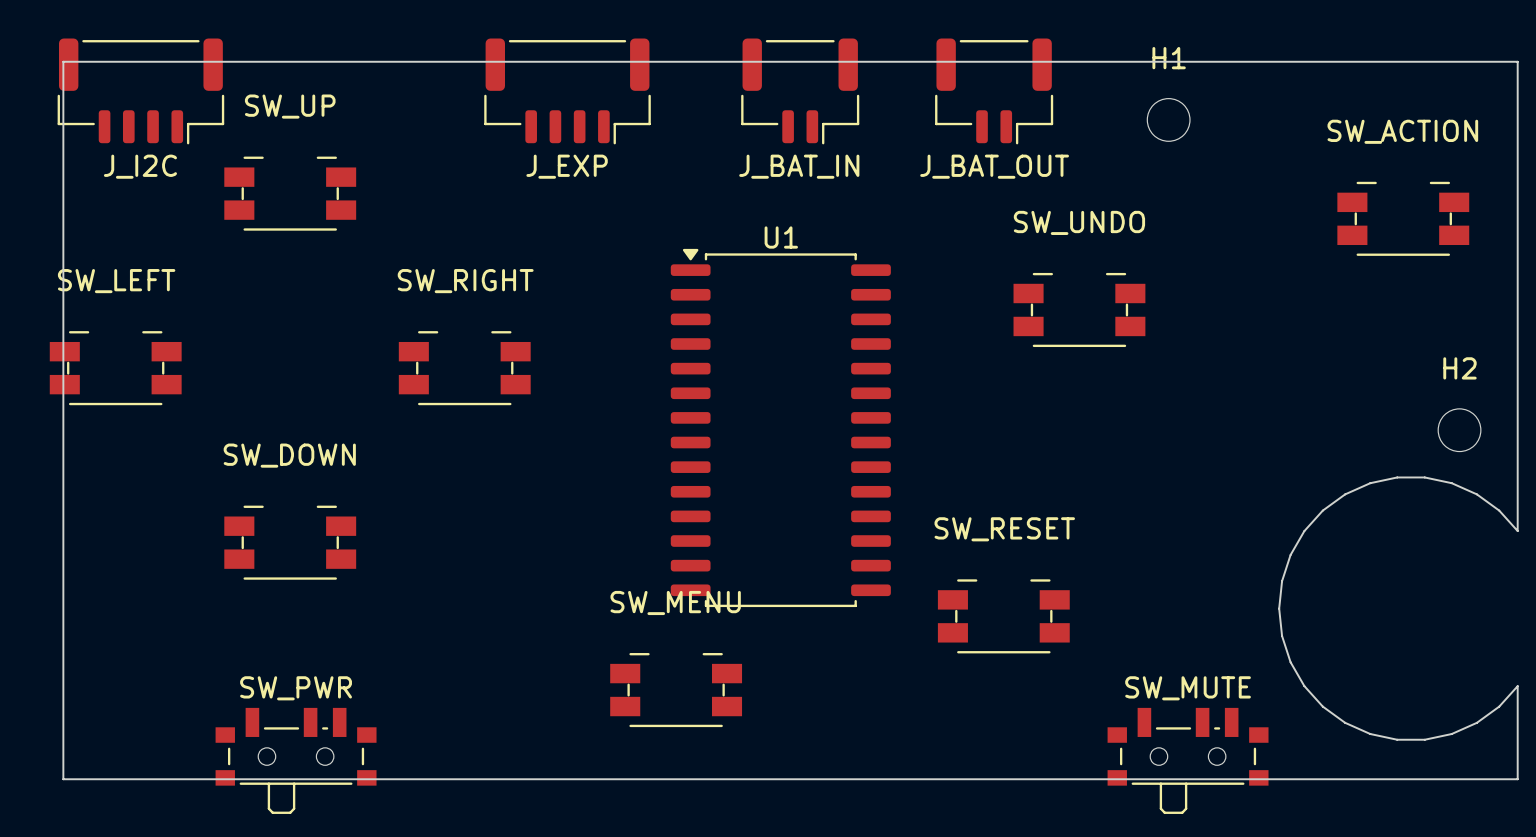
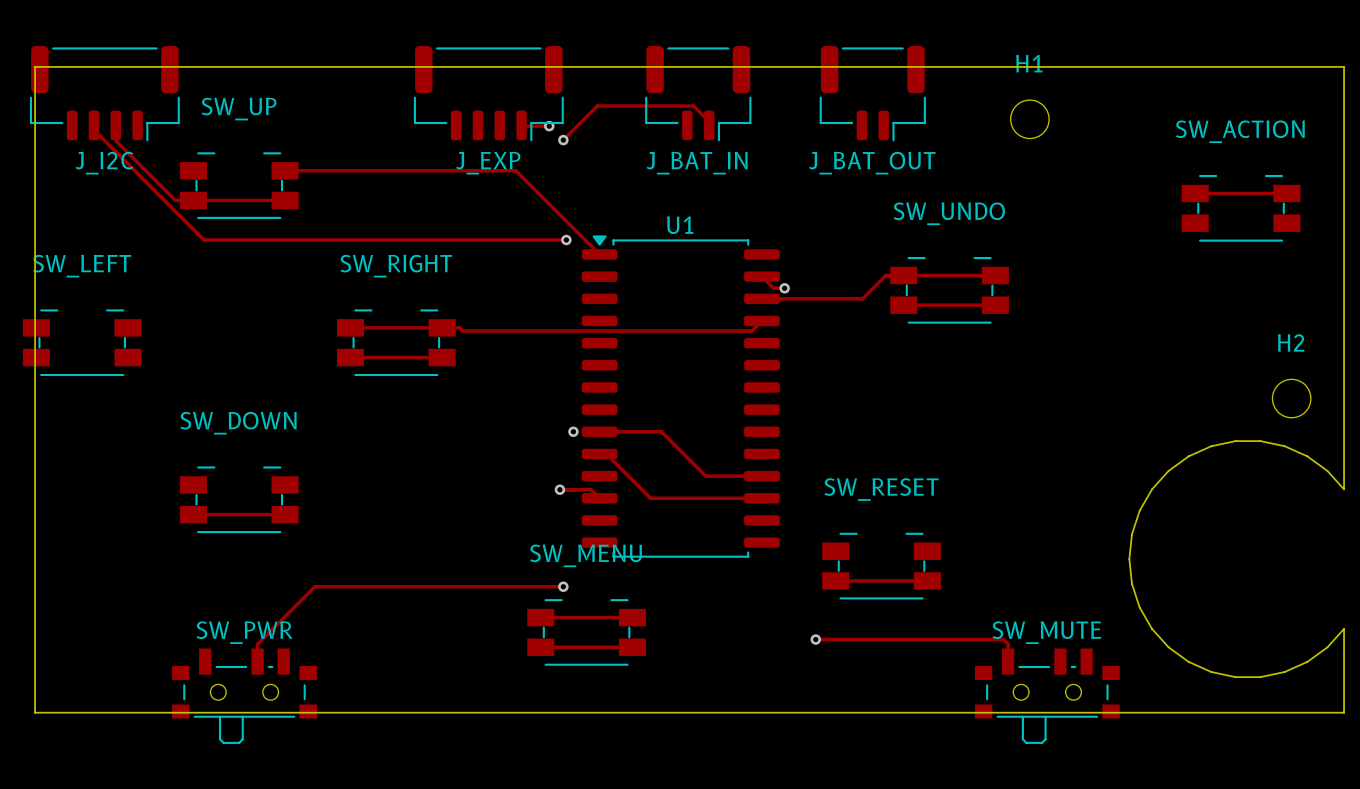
track: none -> (93, 125) (93, 129) (204, 239) (566, 239)
track: none -> (115, 125) (115, 140) (175, 200) (285, 200)
track: none -> (521, 125) (549, 126)
track: none -> (709, 125) (709, 121) (693, 106) (597, 106) (563, 140)
via: none -> (549, 126)
via: none -> (563, 140)
track: none -> (285, 170) (515, 170) (599, 254)
track: none -> (1195, 193) (1286, 193)
via: none -> (566, 239)
track: none -> (995, 275) (885, 275) (862, 298) (761, 298)
track: none -> (761, 276) (773, 288) (784, 288)
via: none -> (784, 288)
track: none -> (903, 305) (995, 305)
track: none -> (761, 320) (751, 331) (463, 331) (460, 327) (350, 327)
track: none -> (350, 357) (442, 357)
via: none -> (573, 431)
track: none -> (599, 431) (661, 431) (705, 476) (761, 476)
track: none -> (599, 453) (606, 453) (650, 498) (761, 498)
track: none -> (559, 489) (591, 489) (599, 498)
via: none -> (559, 489)
track: none -> (193, 514) (285, 514)
track: none -> (835, 580) (927, 580)
track: none -> (563, 586) (314, 586) (257, 644) (257, 661)
via: none -> (563, 586)
track: none -> (540, 617) (632, 617)
track: none -> (815, 639) (1003, 639) (1008, 644) (1008, 661)
via: none -> (815, 639)
track: none -> (540, 647) (632, 647)

